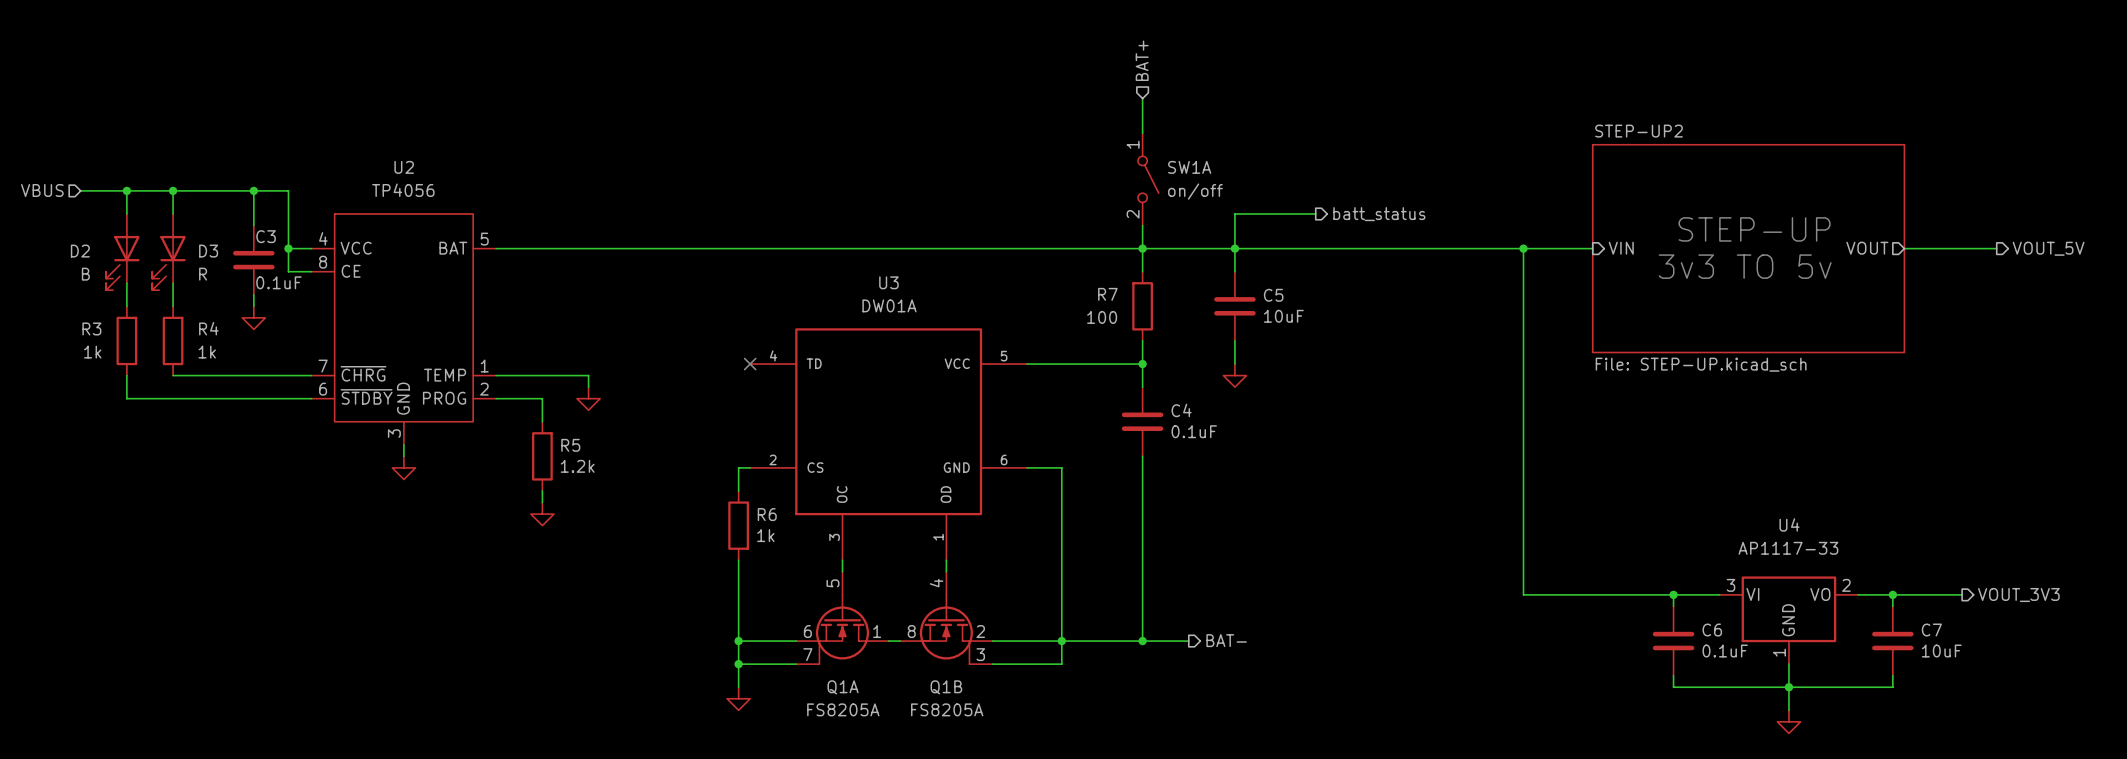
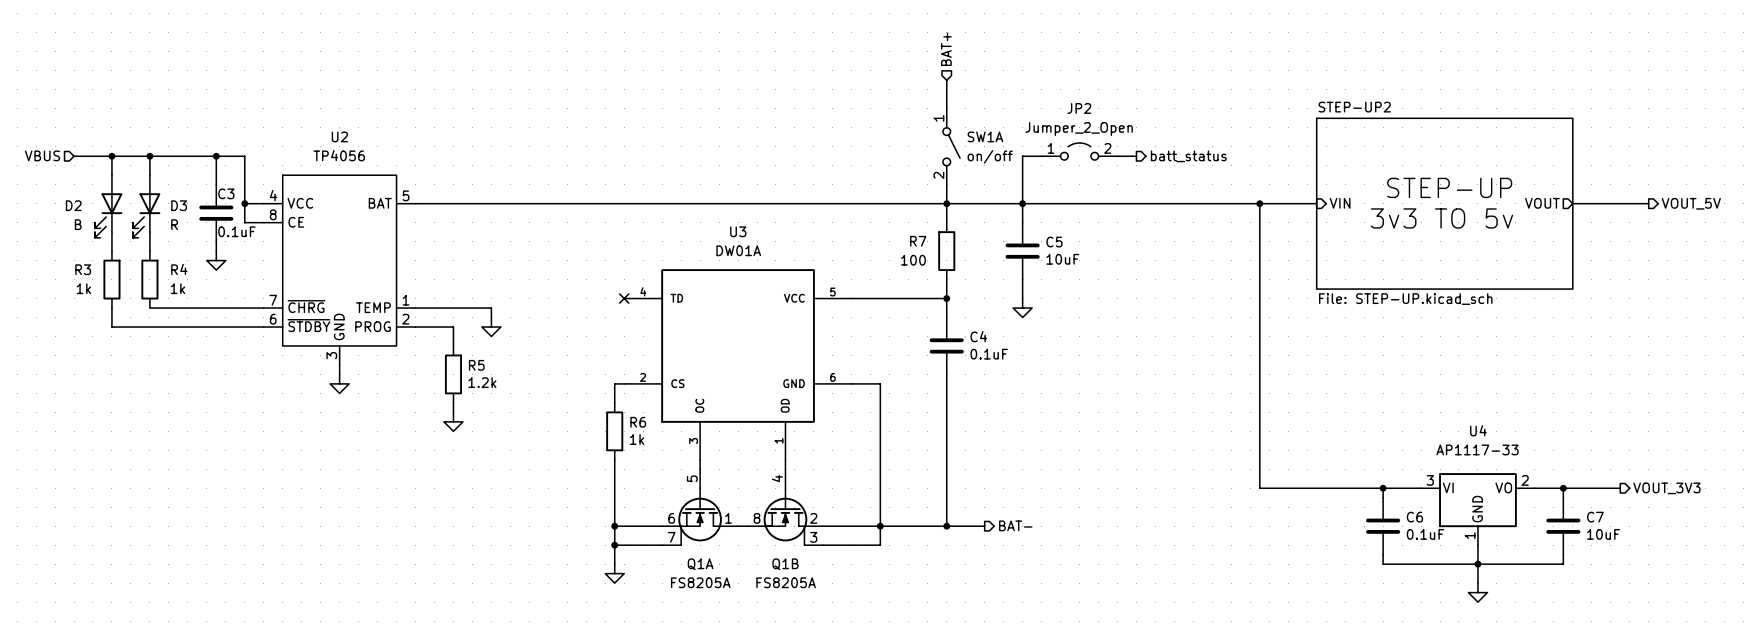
JP2: none -> Jumper_2_Open (1079, 151)
wire: none -> (1117, 156) (1136, 156)
wire: (1234, 213) (1315, 213) -> (1022, 175) (1022, 156) (1041, 156)
hierarchical label position: batt_status (1379, 214) -> batt_status (1188, 156)

